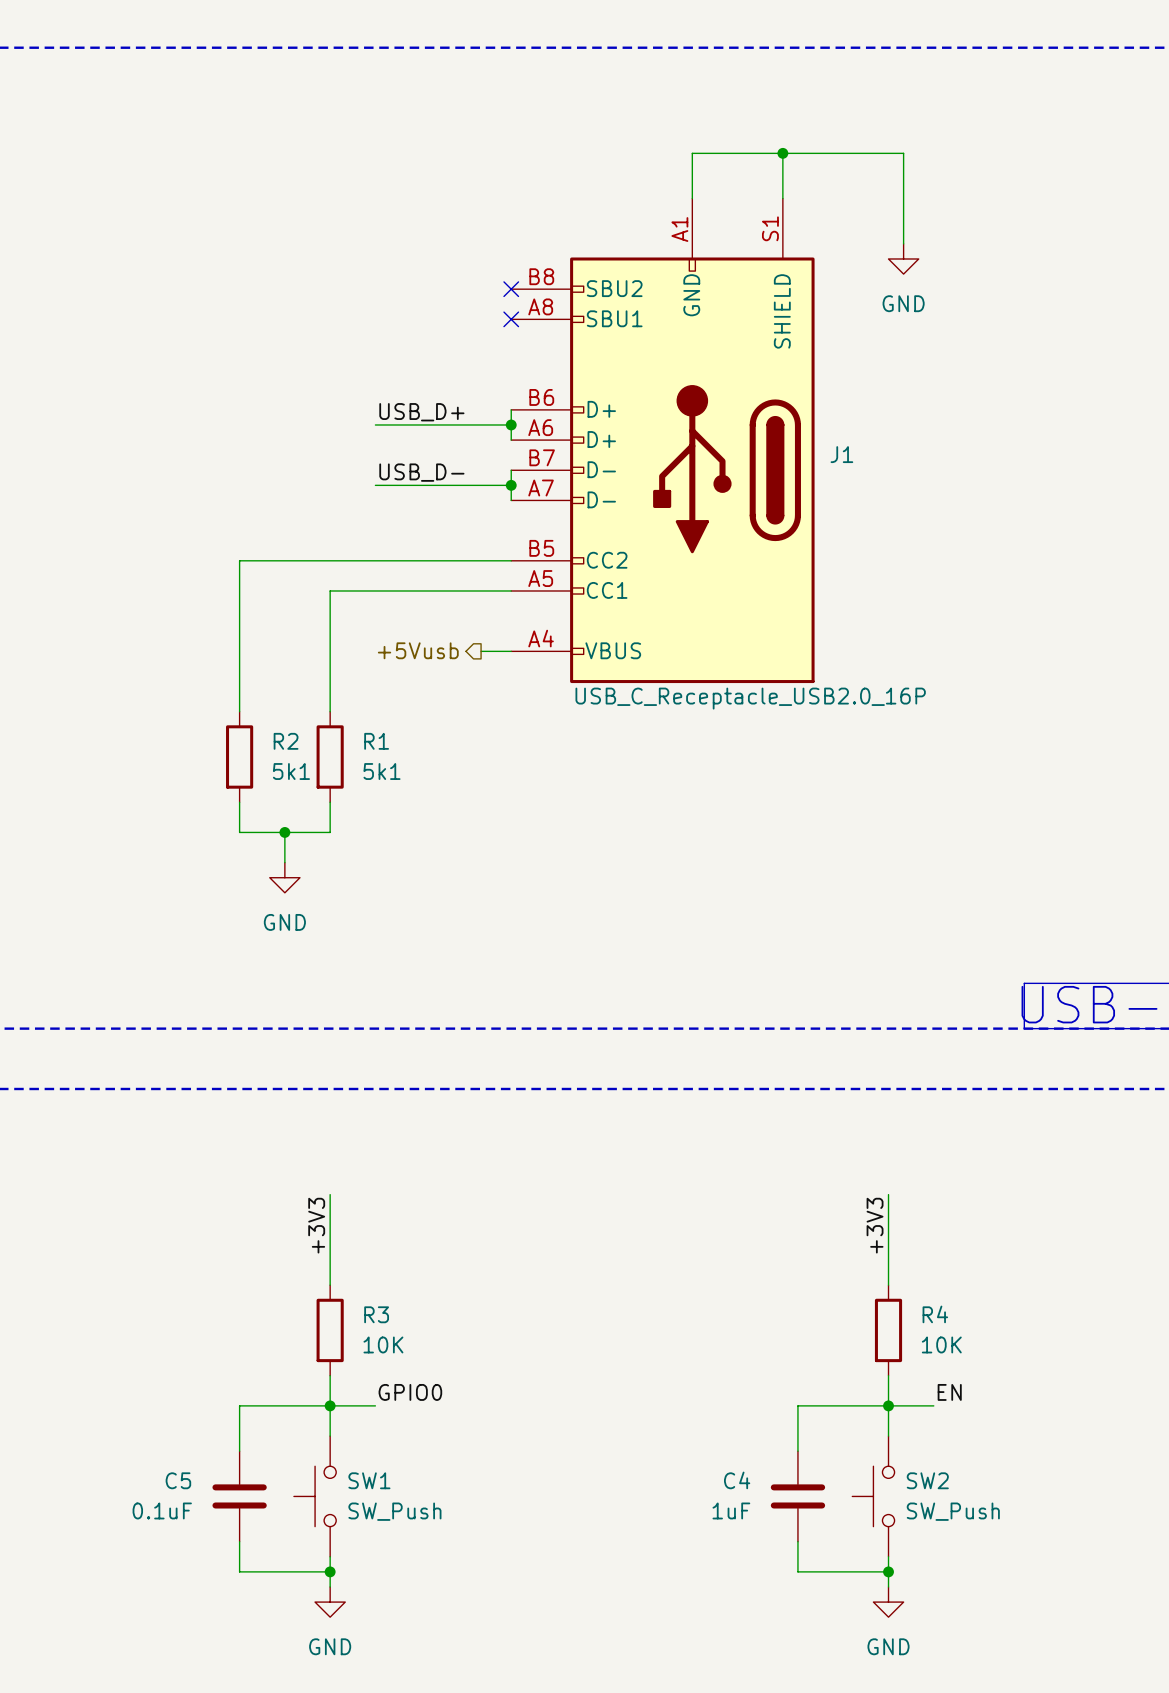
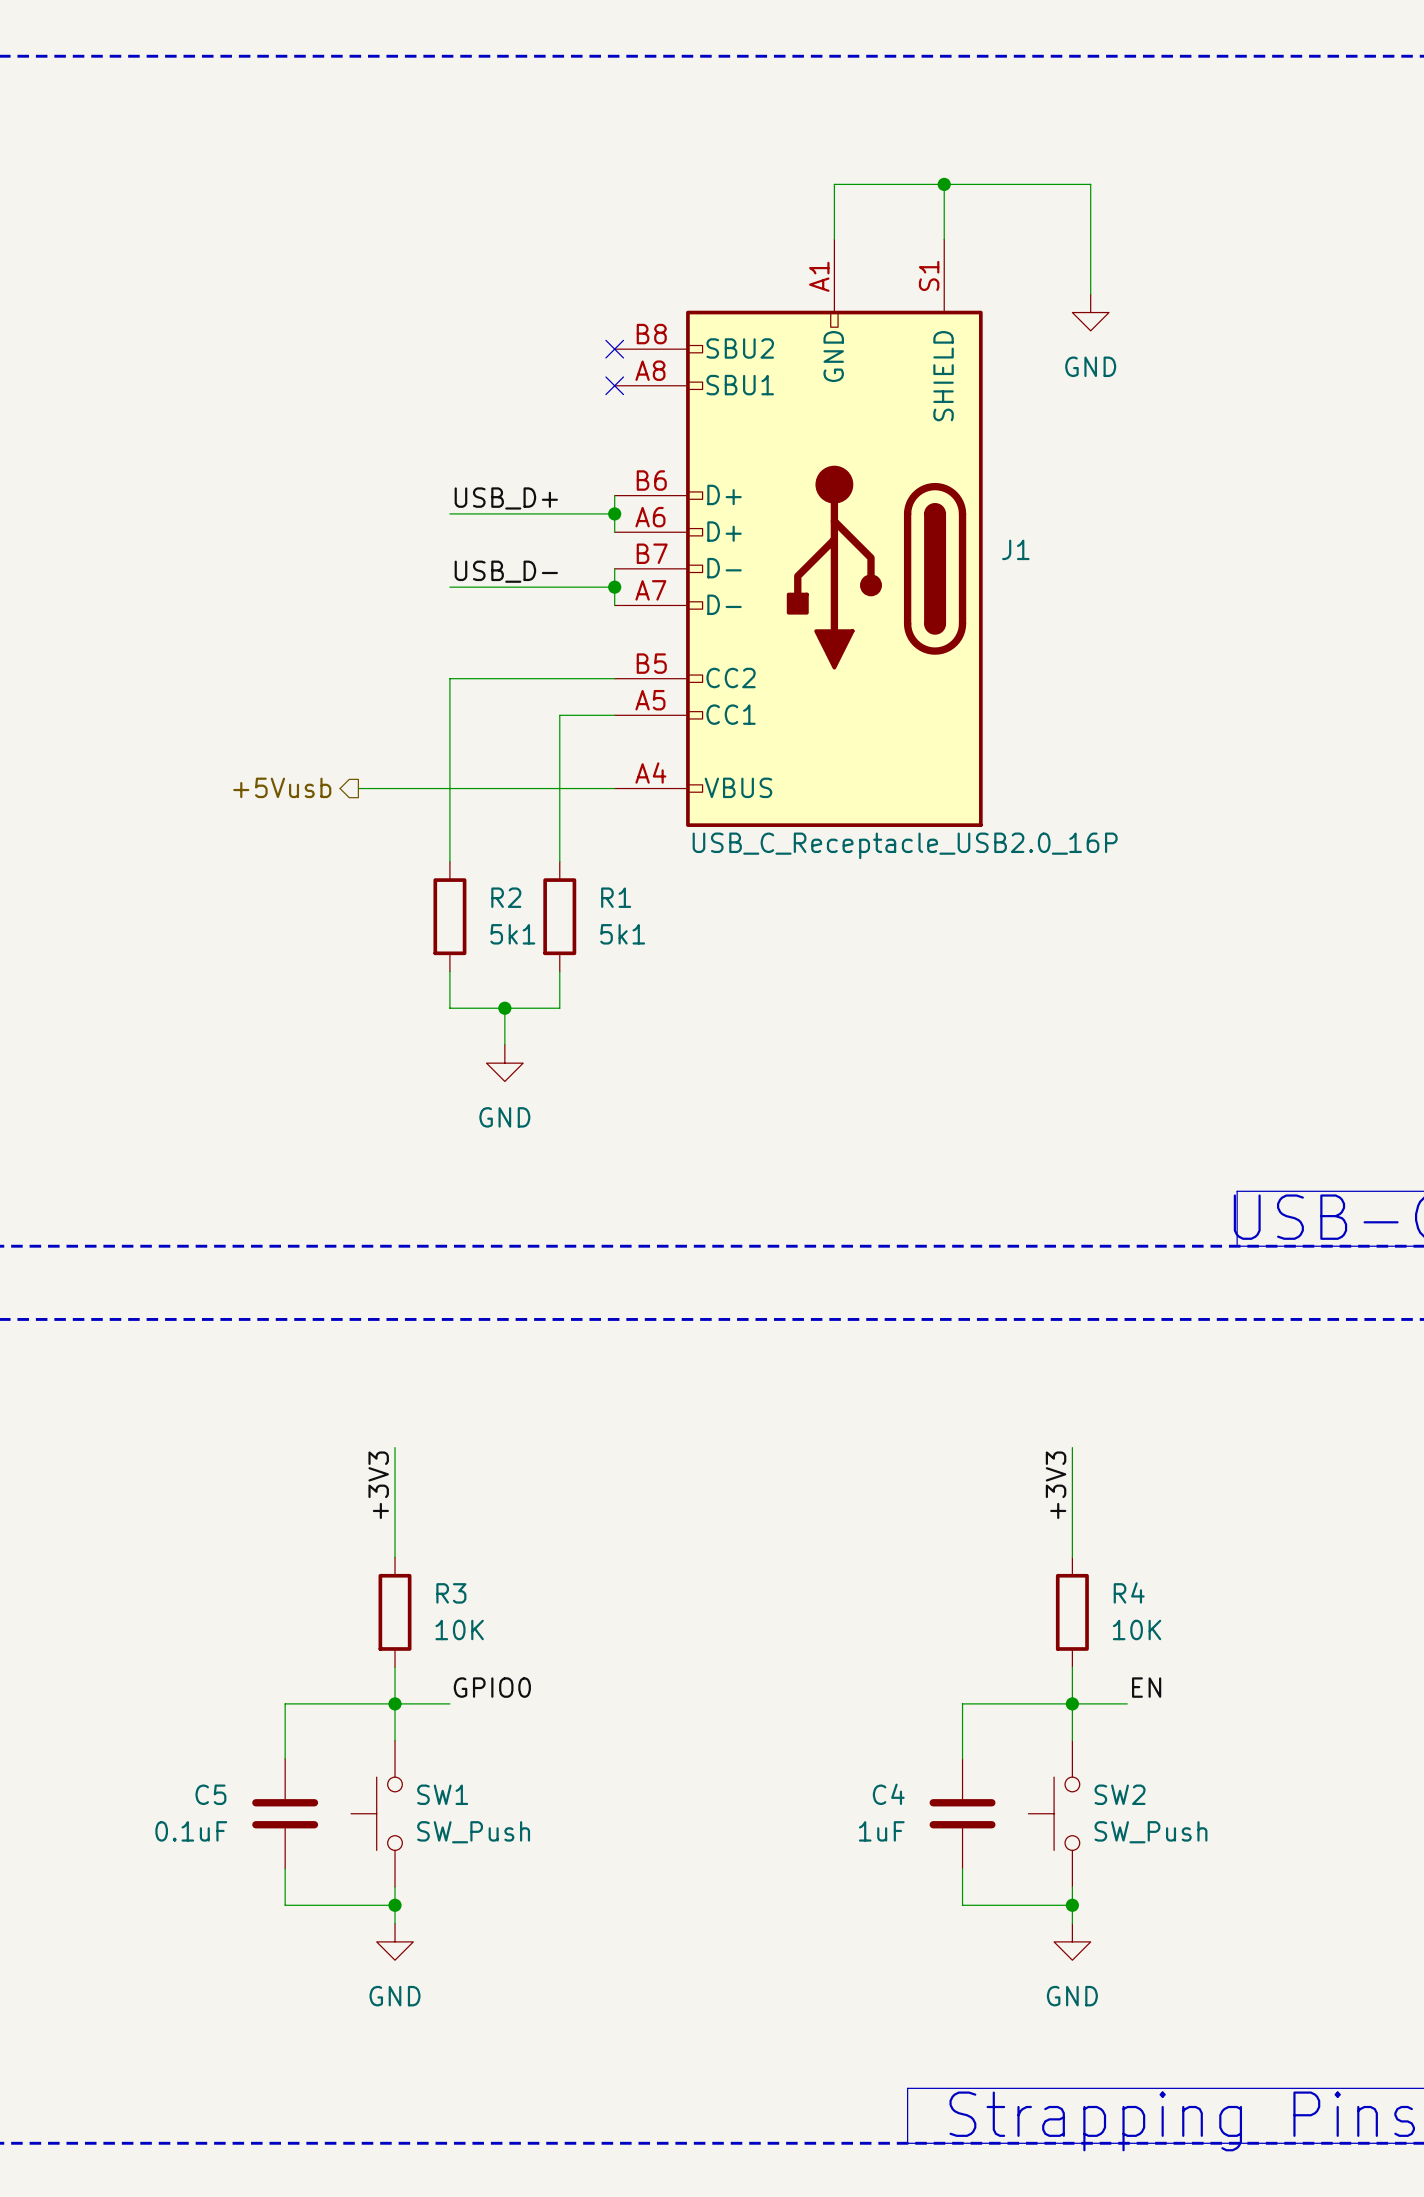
wire: (375, 560) (239, 560) (239, 711) -> (449, 678) (449, 861)
wire: (465, 590) (330, 590) (330, 711) -> (559, 715) (559, 861)
hierarchical label position: +5Vusb (418, 650) -> +5Vusb (282, 787)
wire: none -> (358, 788) (578, 788)
R2 position: (239, 756) -> (449, 916)
R1 position: (330, 756) -> (559, 916)
wire: (239, 802) (239, 832) (330, 832) (330, 802) -> (449, 971) (449, 1008) (559, 1008) (559, 971)
wire: (284, 832) (284, 862) -> (504, 1008) (504, 1044)
junction: (284, 832) -> none
junction: none -> (504, 1008)
power symbol position: GND (284, 877) -> GND (504, 1063)

